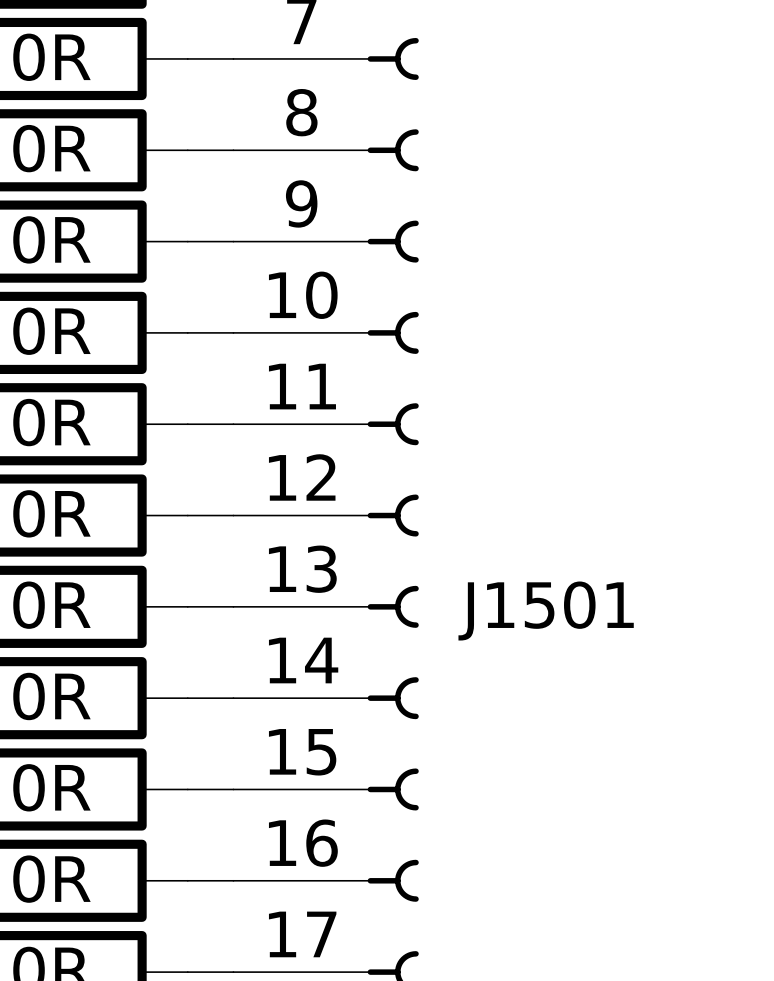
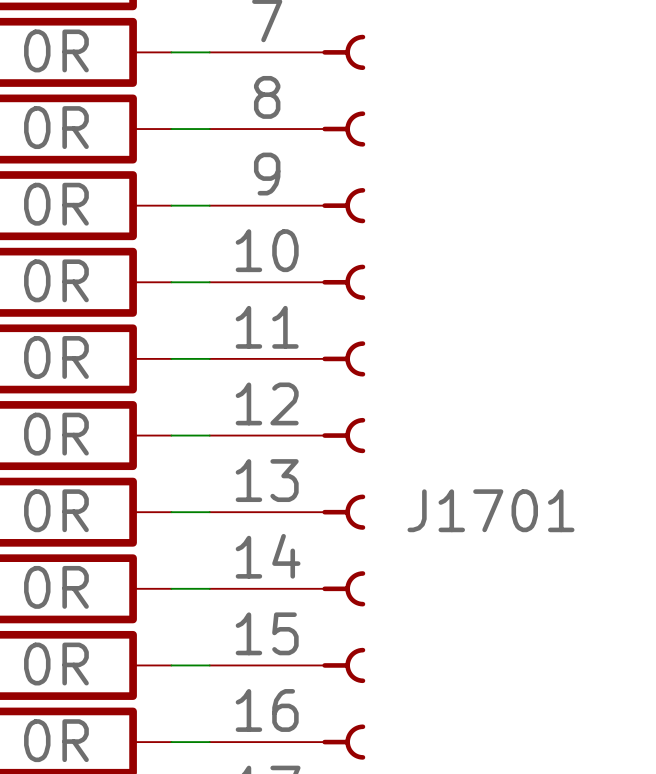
J1501 name: J1501 (546, 611) -> J1701 (490, 510)

